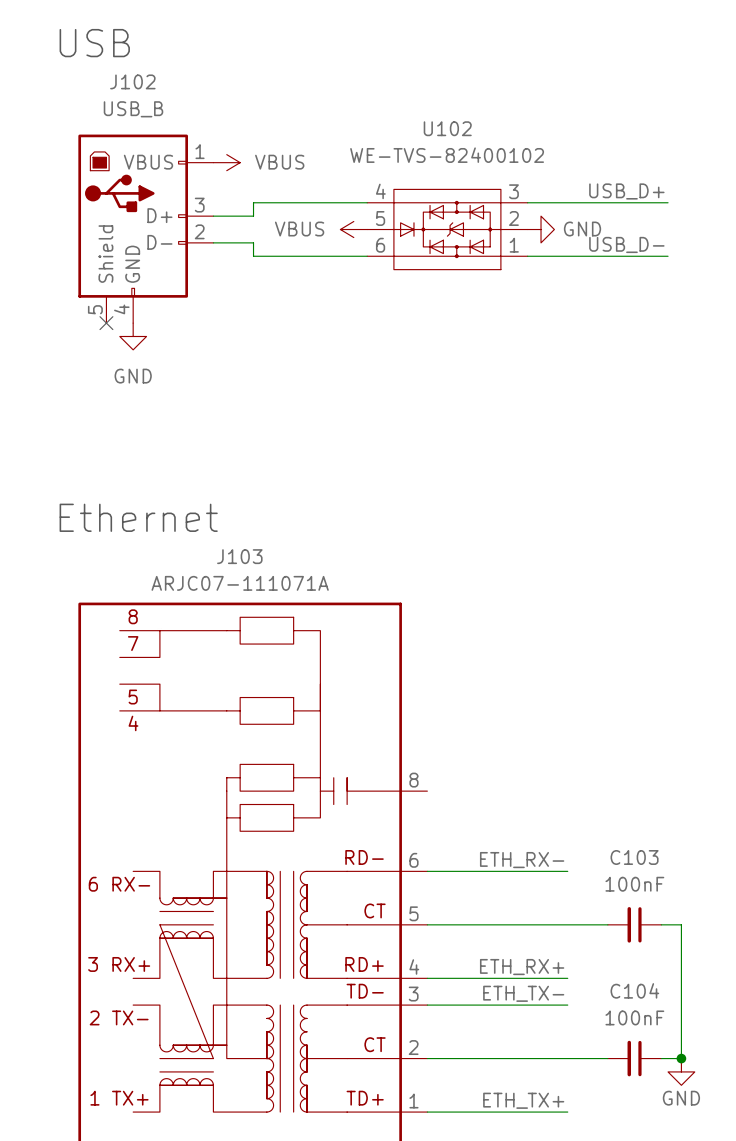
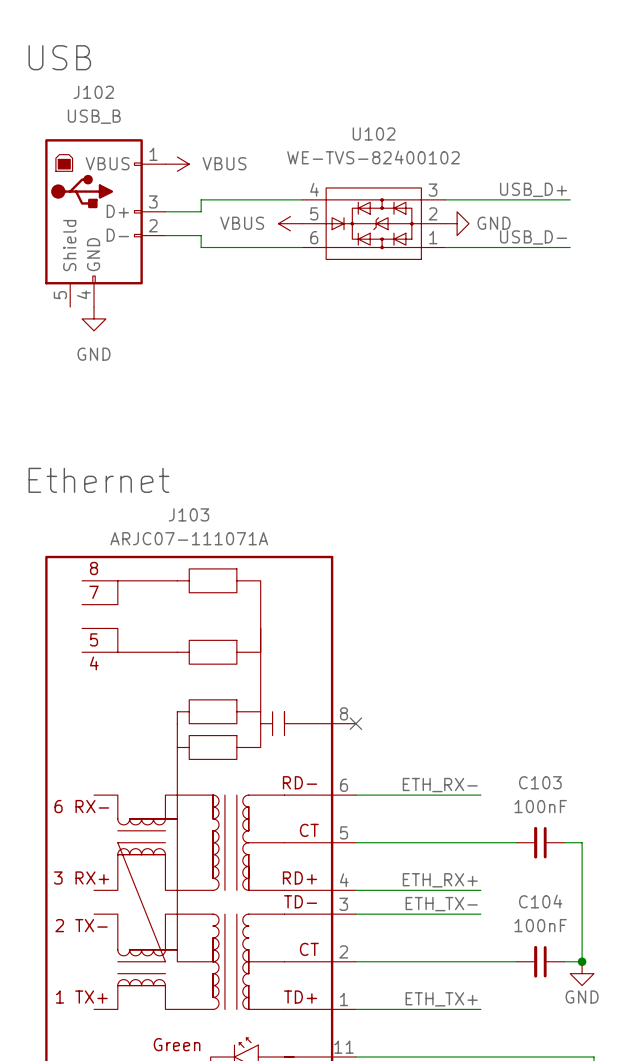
no-connect mark: (106, 323) -> none
no-connect mark: none -> (355, 723)

